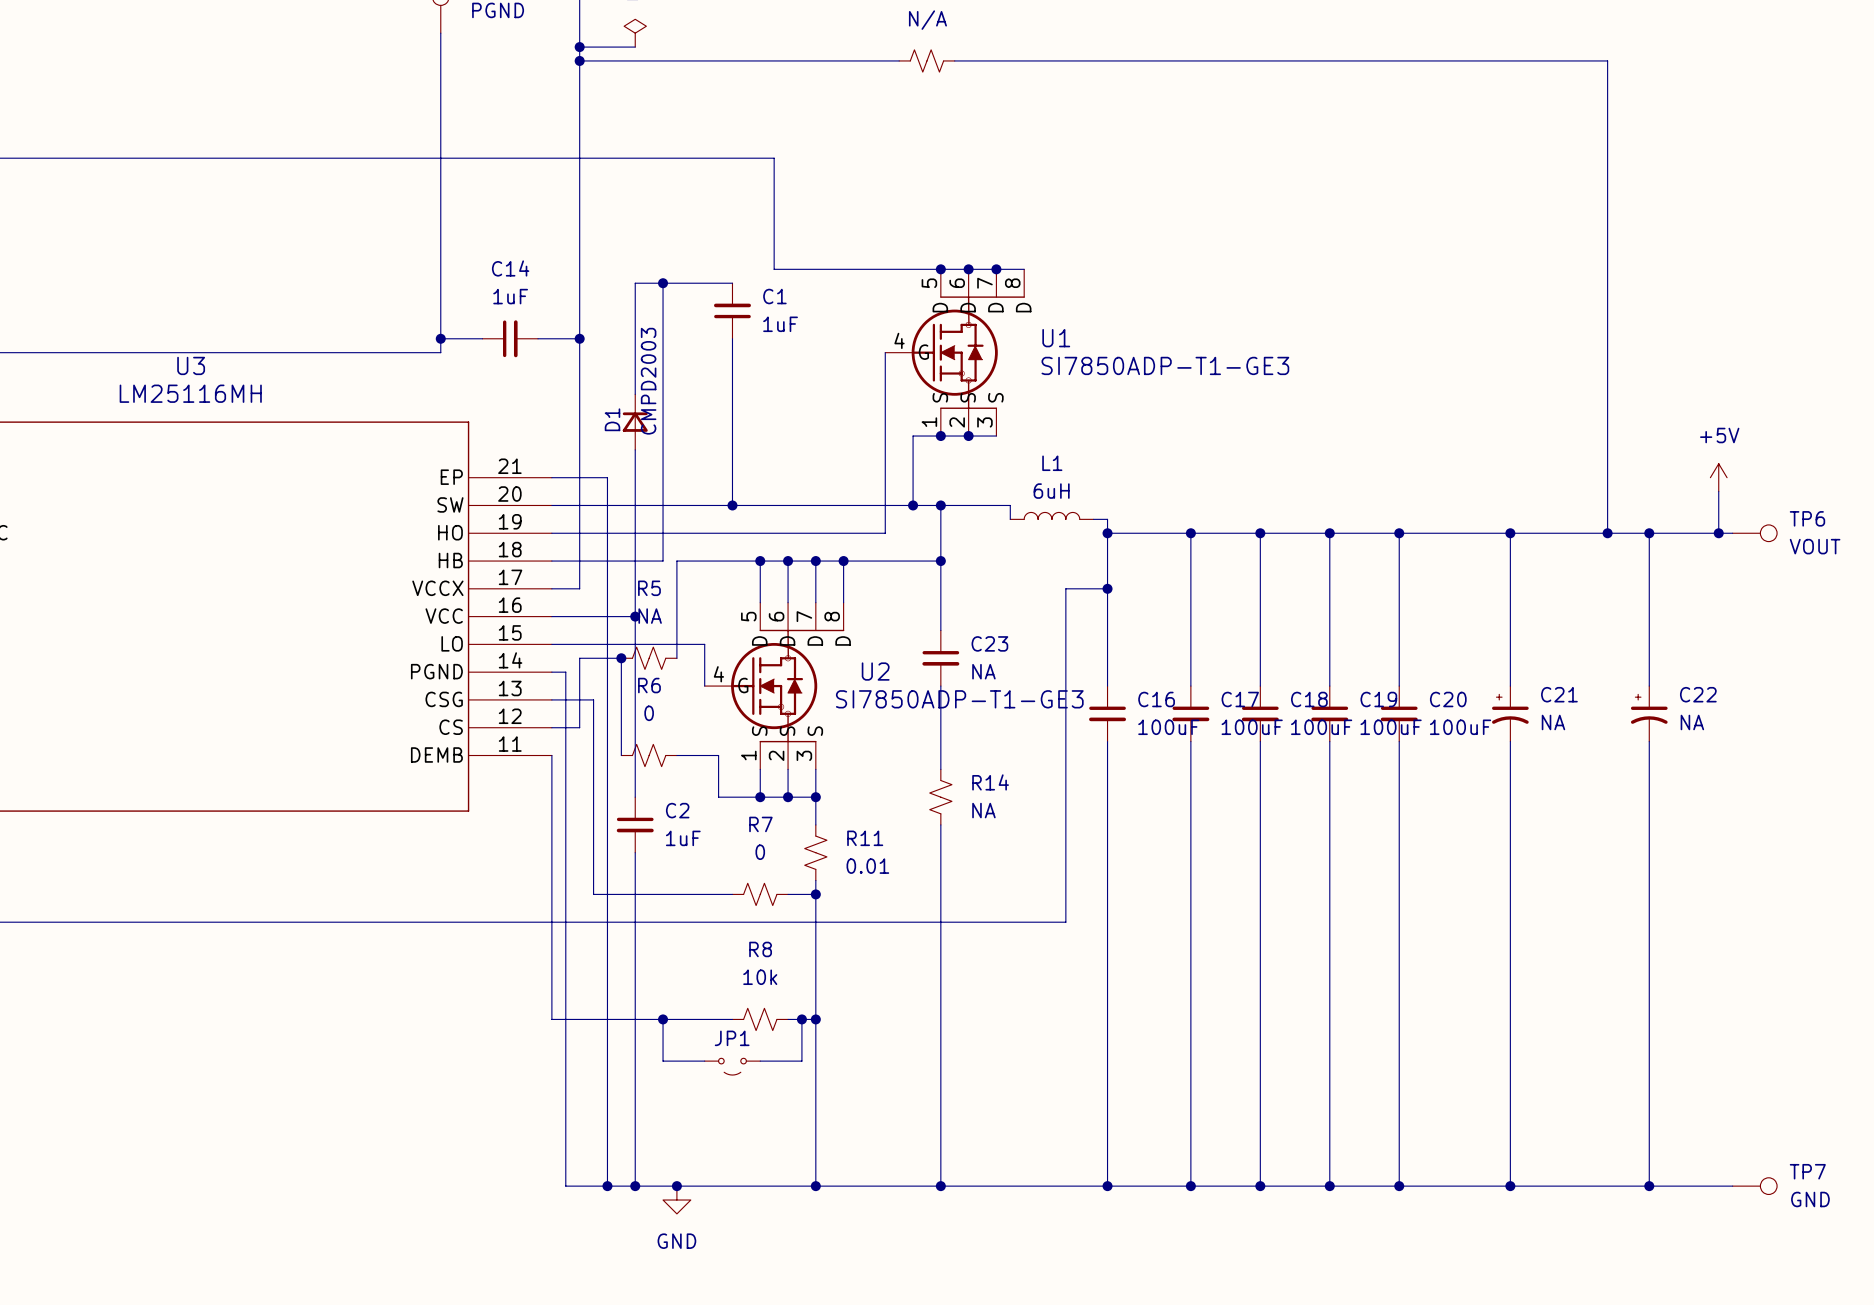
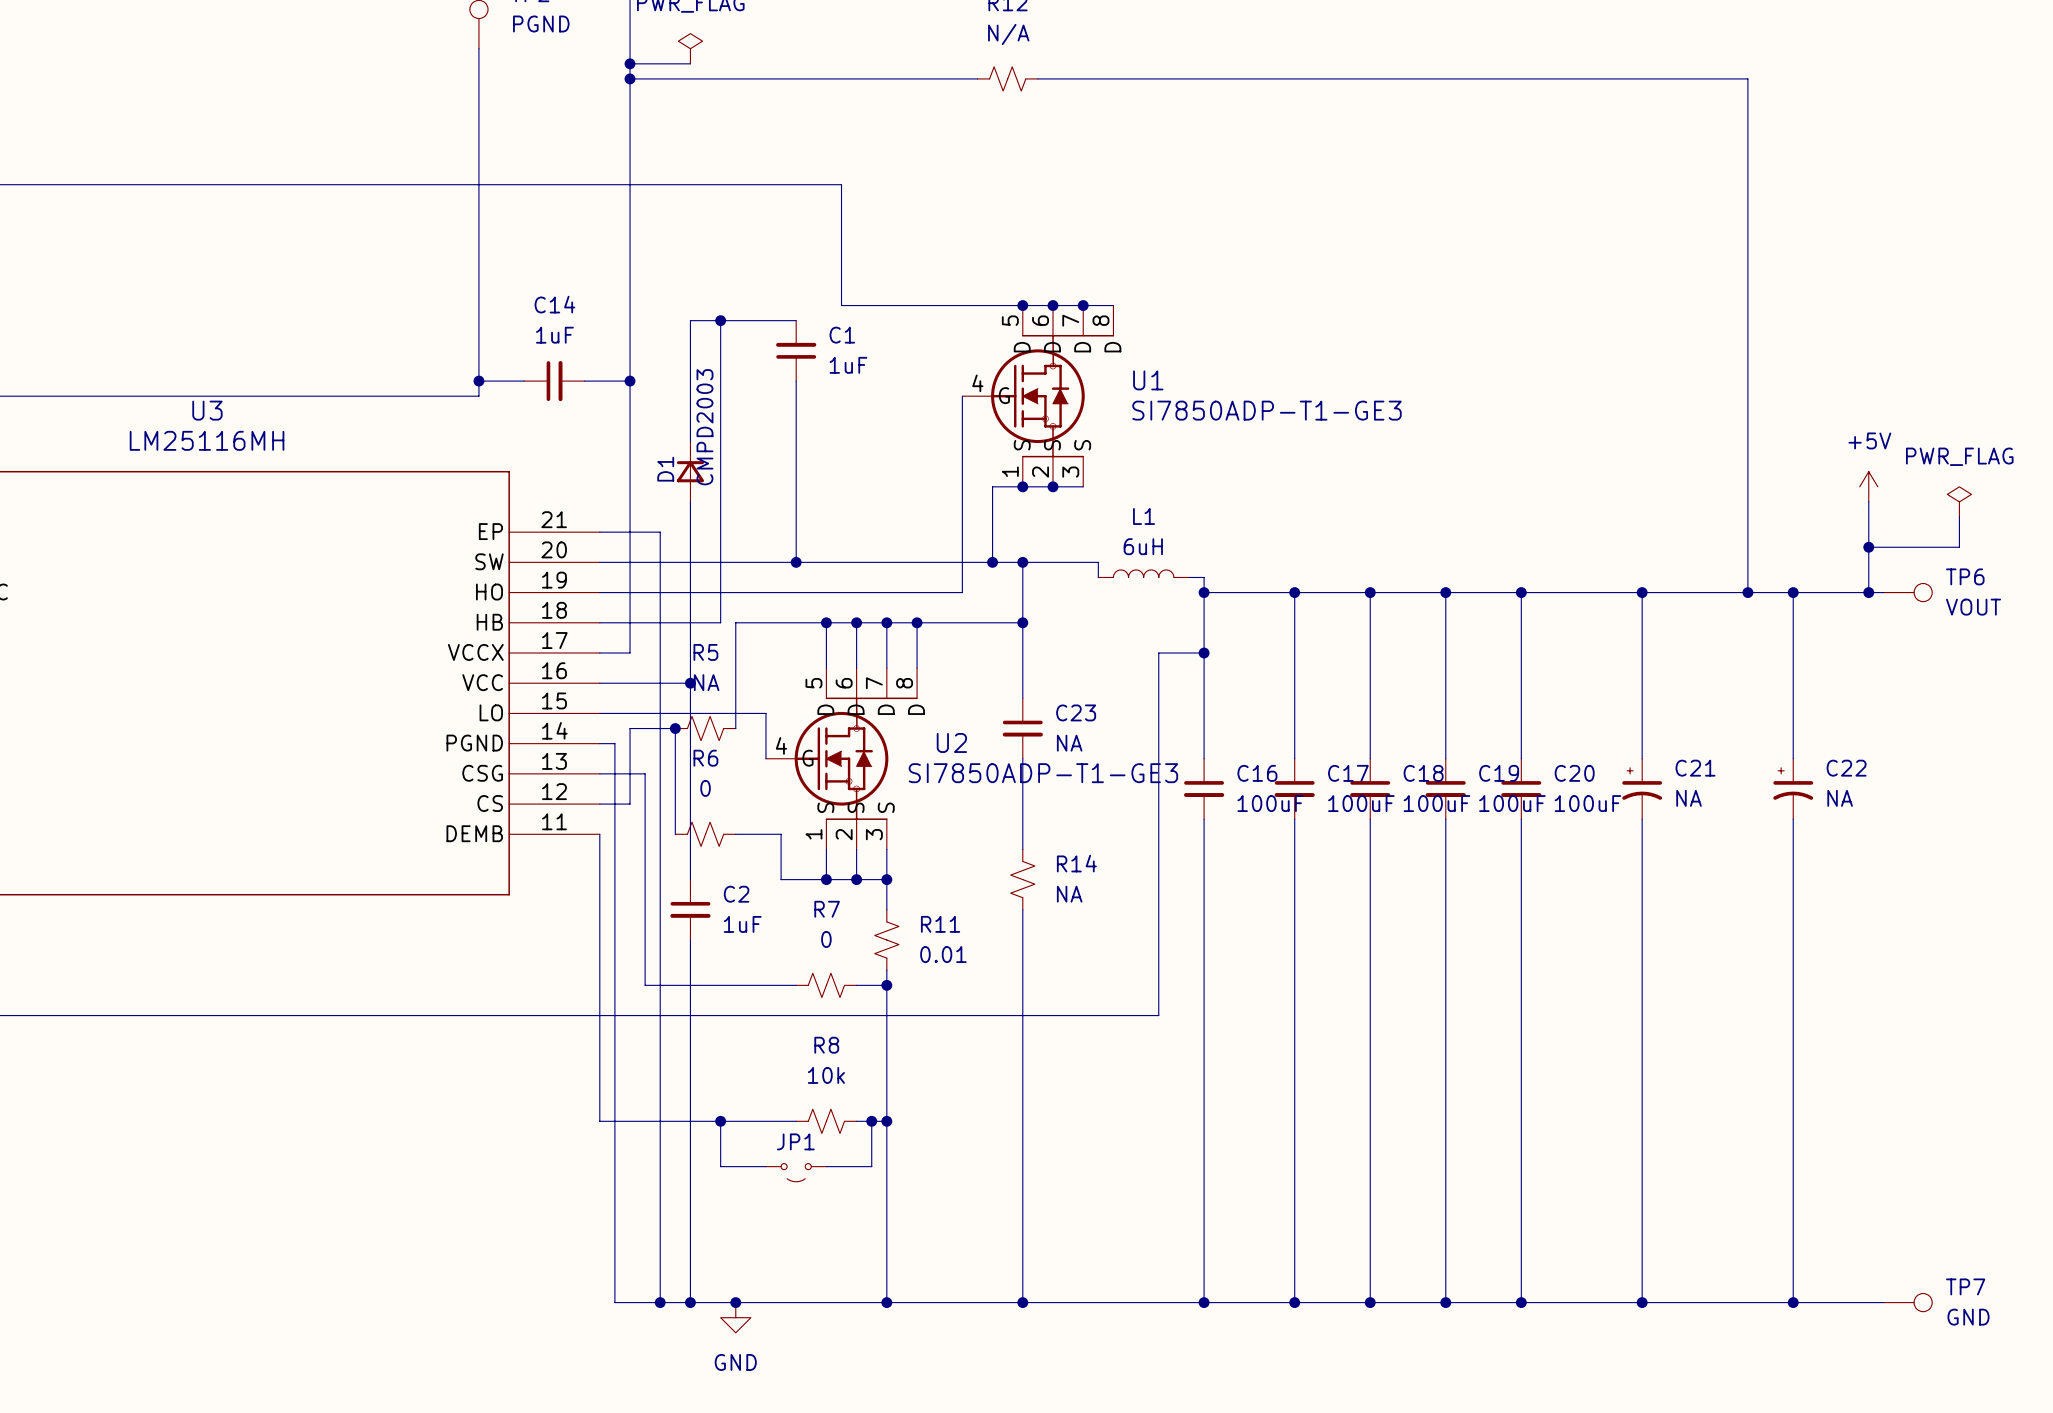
wire: none -> (1868, 501) (1868, 547) (1959, 547) (1959, 517)
power symbol: none -> PWR_FLAG (1959, 501)
power symbol position: +5V (1718, 477) -> +5V (1868, 486)
junction: none -> (1868, 547)

